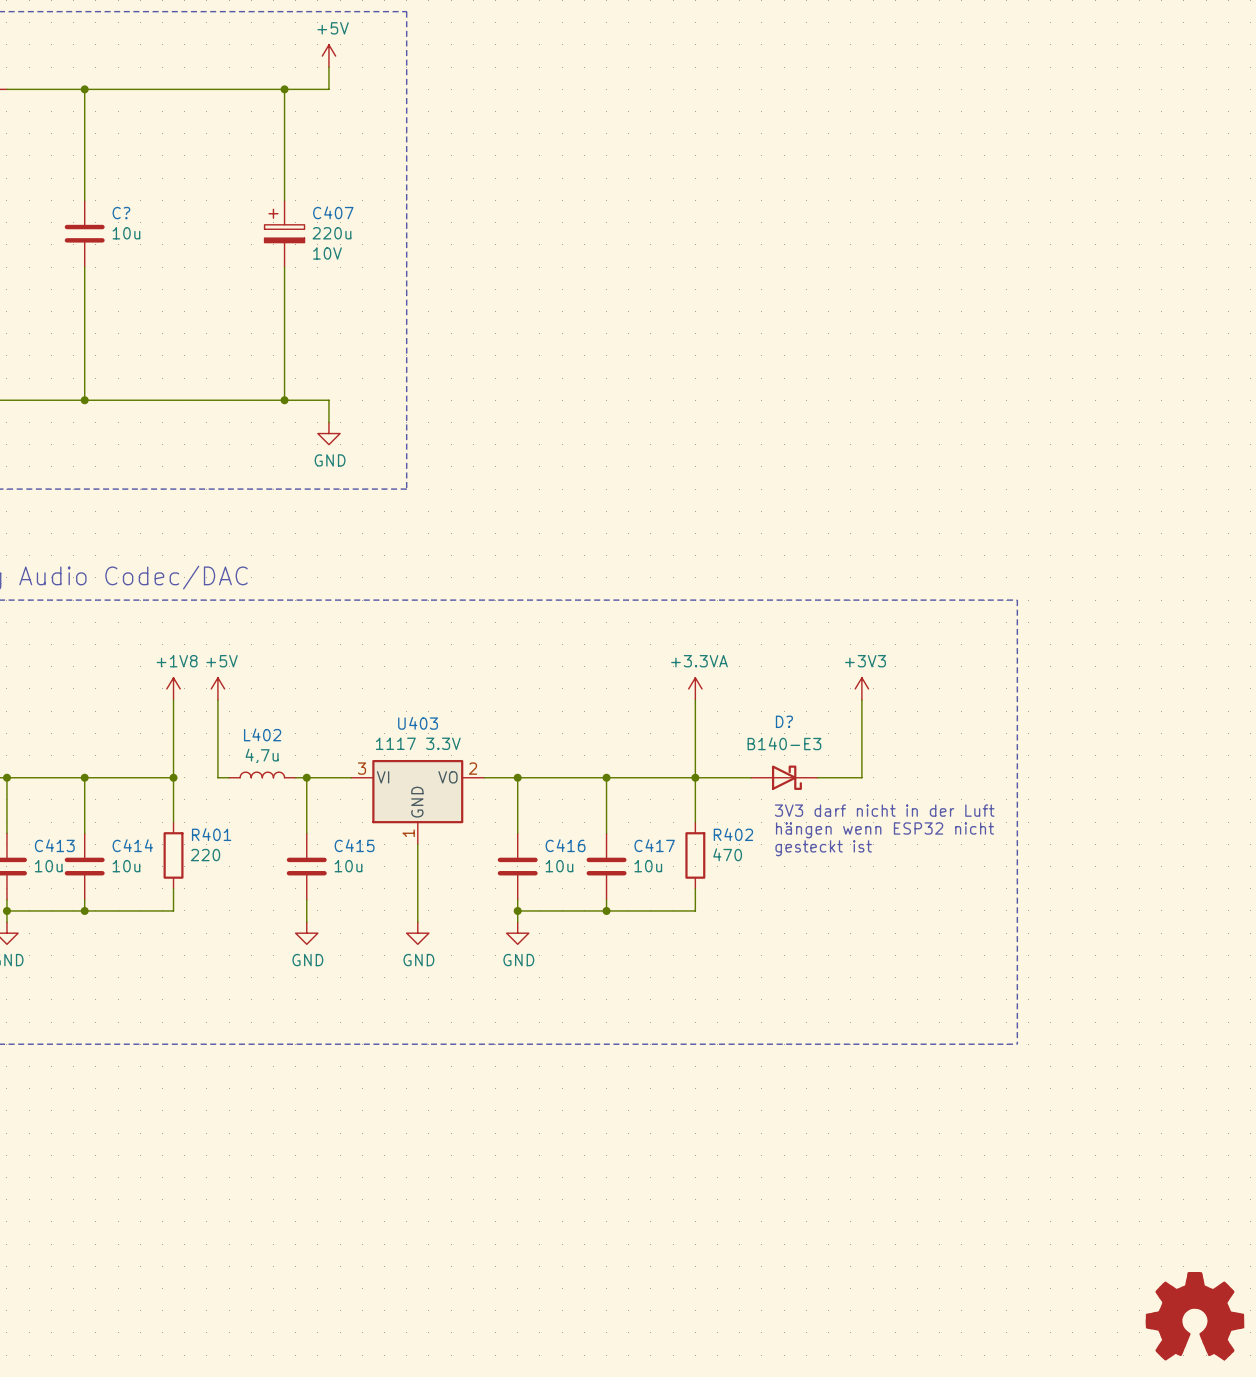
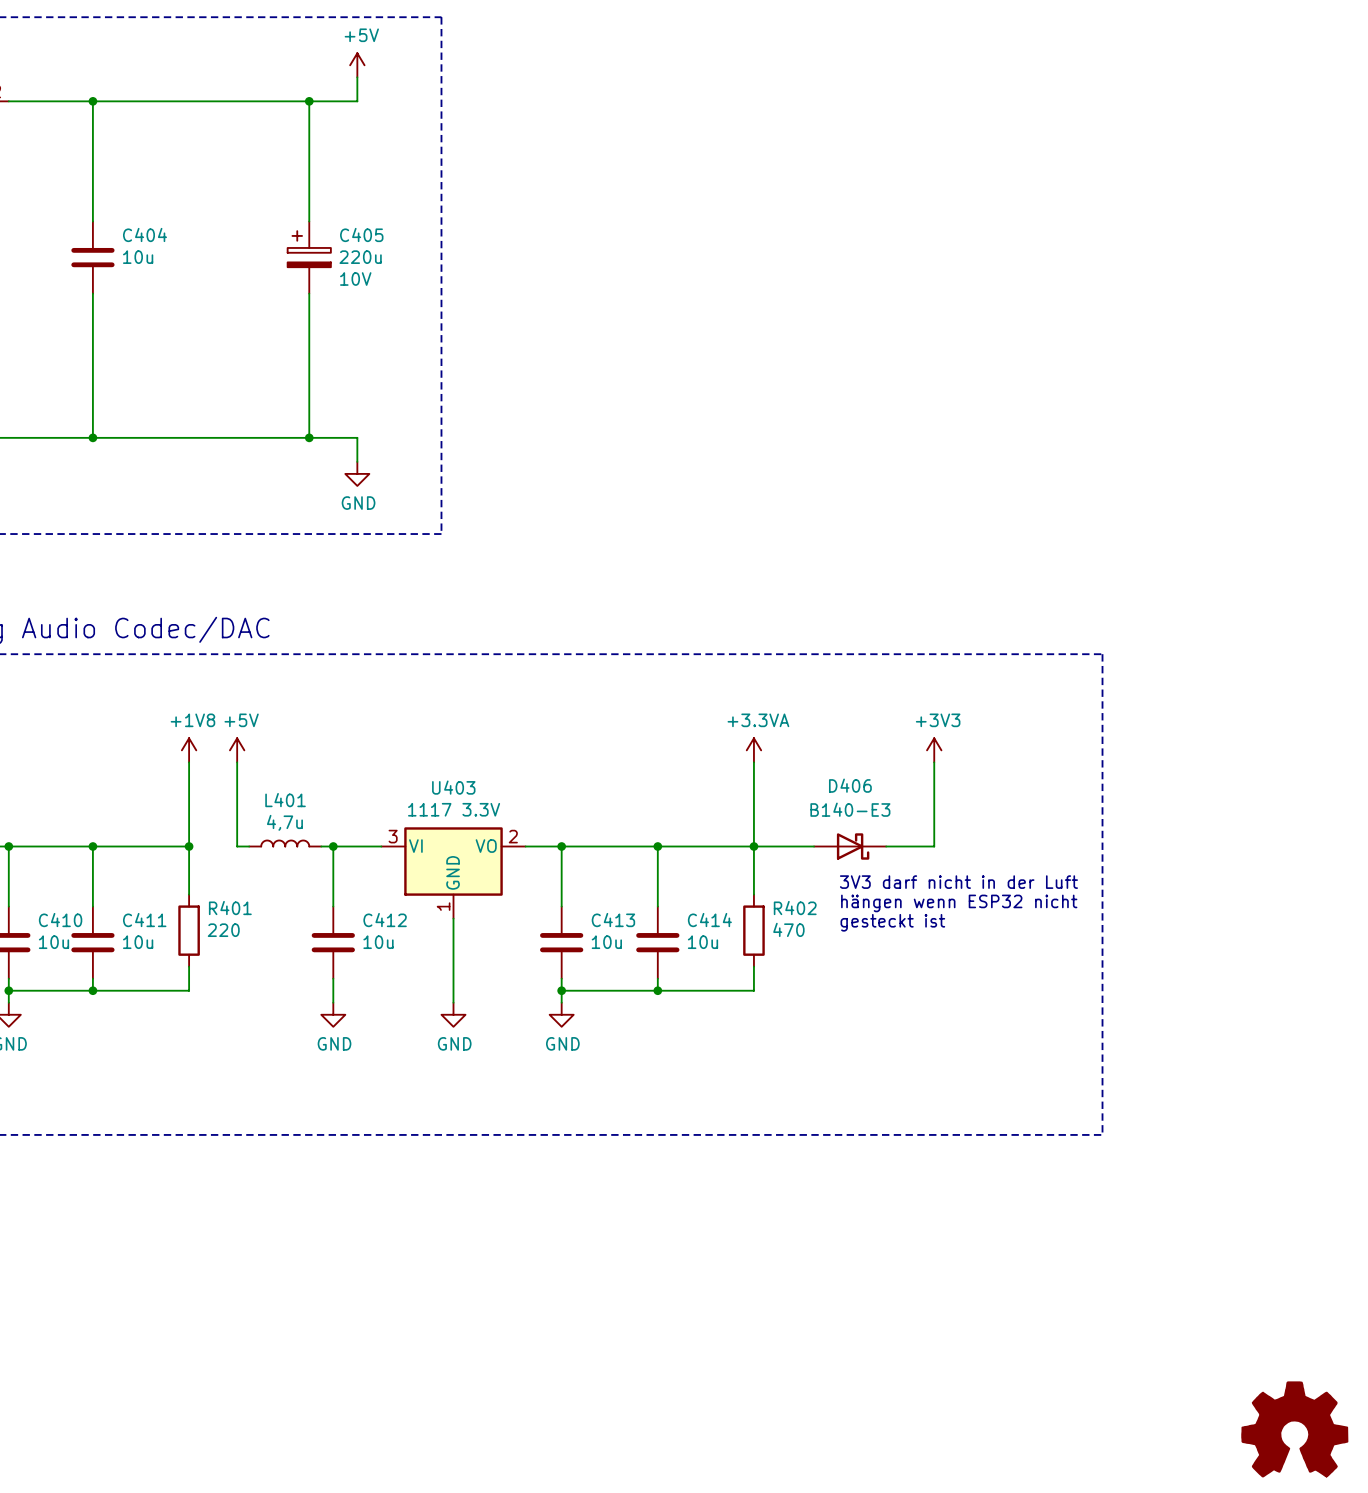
C407 name: C407 (333, 212) -> C405 (361, 234)
C? name: C? (121, 213) -> C404 (144, 234)
D? name: D? (784, 721) -> D406 (850, 785)
L402 name: L402 (262, 734) -> L401 (285, 800)
C413 name: C413 (54, 845) -> C410 (60, 920)
C414 name: C414 (132, 845) -> C411 (144, 920)
C415 name: C415 (354, 845) -> C412 (385, 920)
C416 name: C416 (565, 845) -> C413 (613, 920)
C417 name: C417 (654, 845) -> C414 (709, 920)

